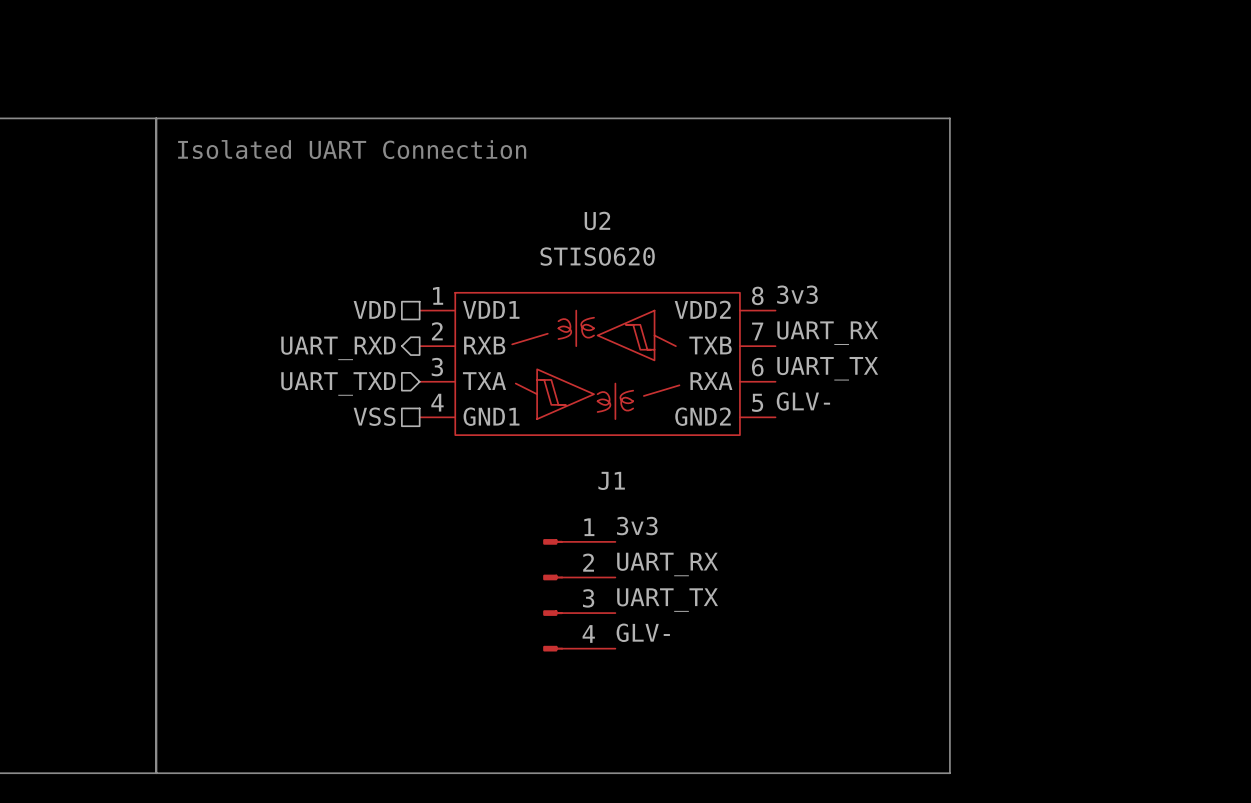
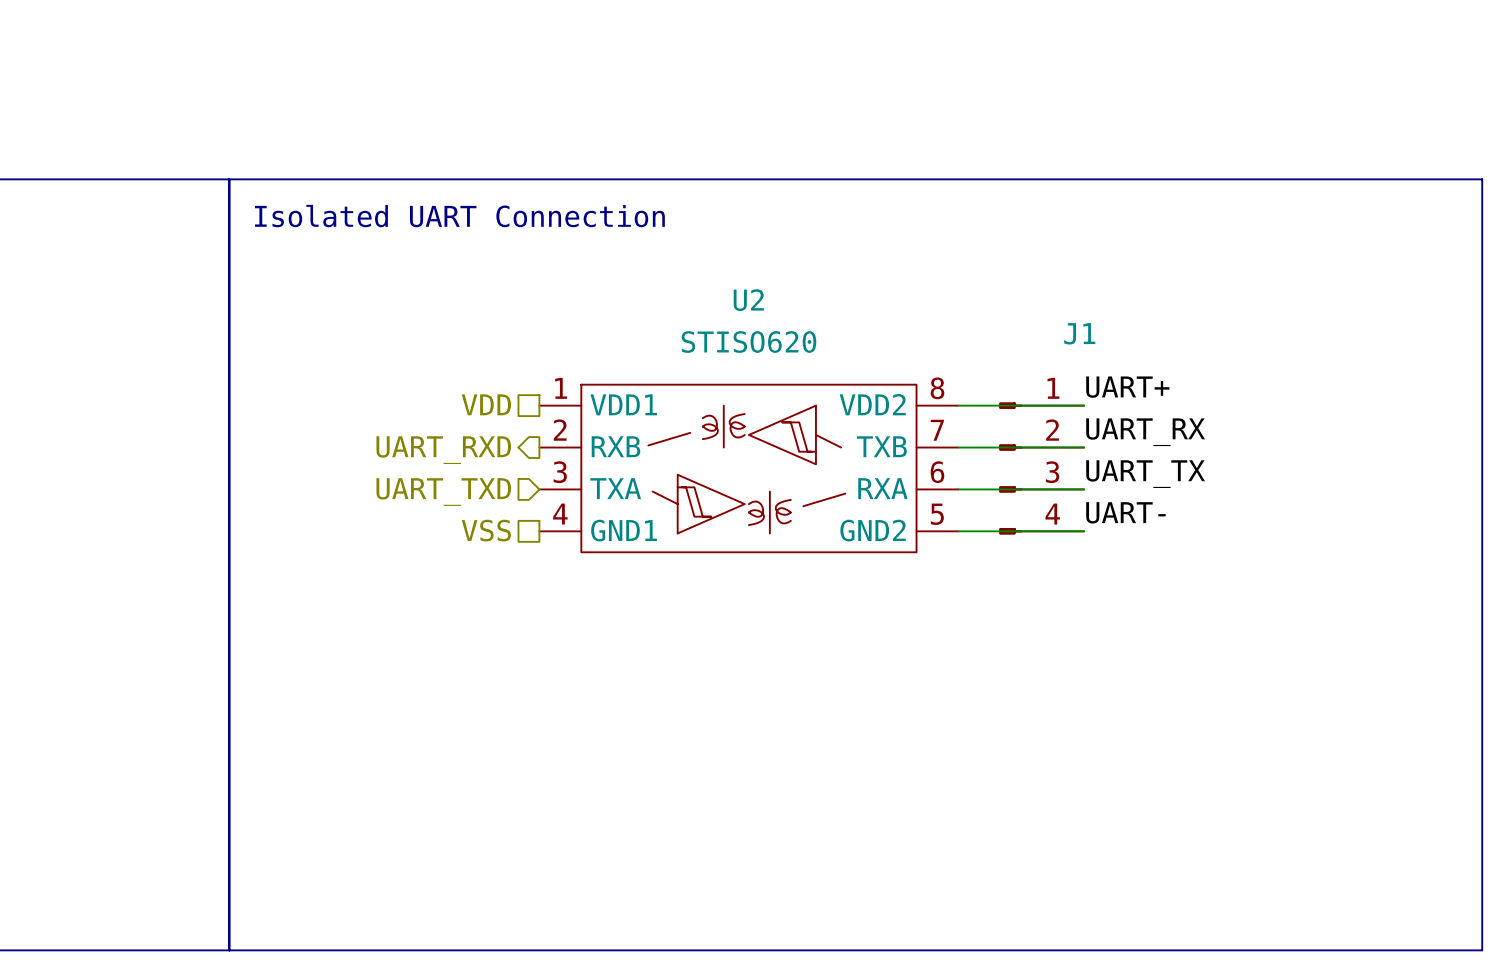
line: (949, 118) (949, 773) -> (1163, 179) (1482, 179) (1482, 950) (1163, 950)
label: 3v3 (797, 294) -> none
label: none -> UART+ (1127, 387)
wire: none -> (958, 405) (1084, 405)
label position: UART_RX (827, 333) -> UART_RX (1145, 432)
wire: none -> (958, 447) (1084, 447)
label position: UART_TX (827, 368) -> UART_TX (1145, 474)
wire: none -> (958, 489) (1084, 489)
label: GLV- (803, 401) -> none
label: none -> UART- (1125, 512)
wire: none -> (958, 531) (1084, 531)
label: 3v3 (637, 526) -> none
label: UART_RX (667, 564) -> none
J1 position: (579, 595) -> (1041, 468)
label: UART_TX (667, 600) -> none
label: GLV- (643, 632) -> none

